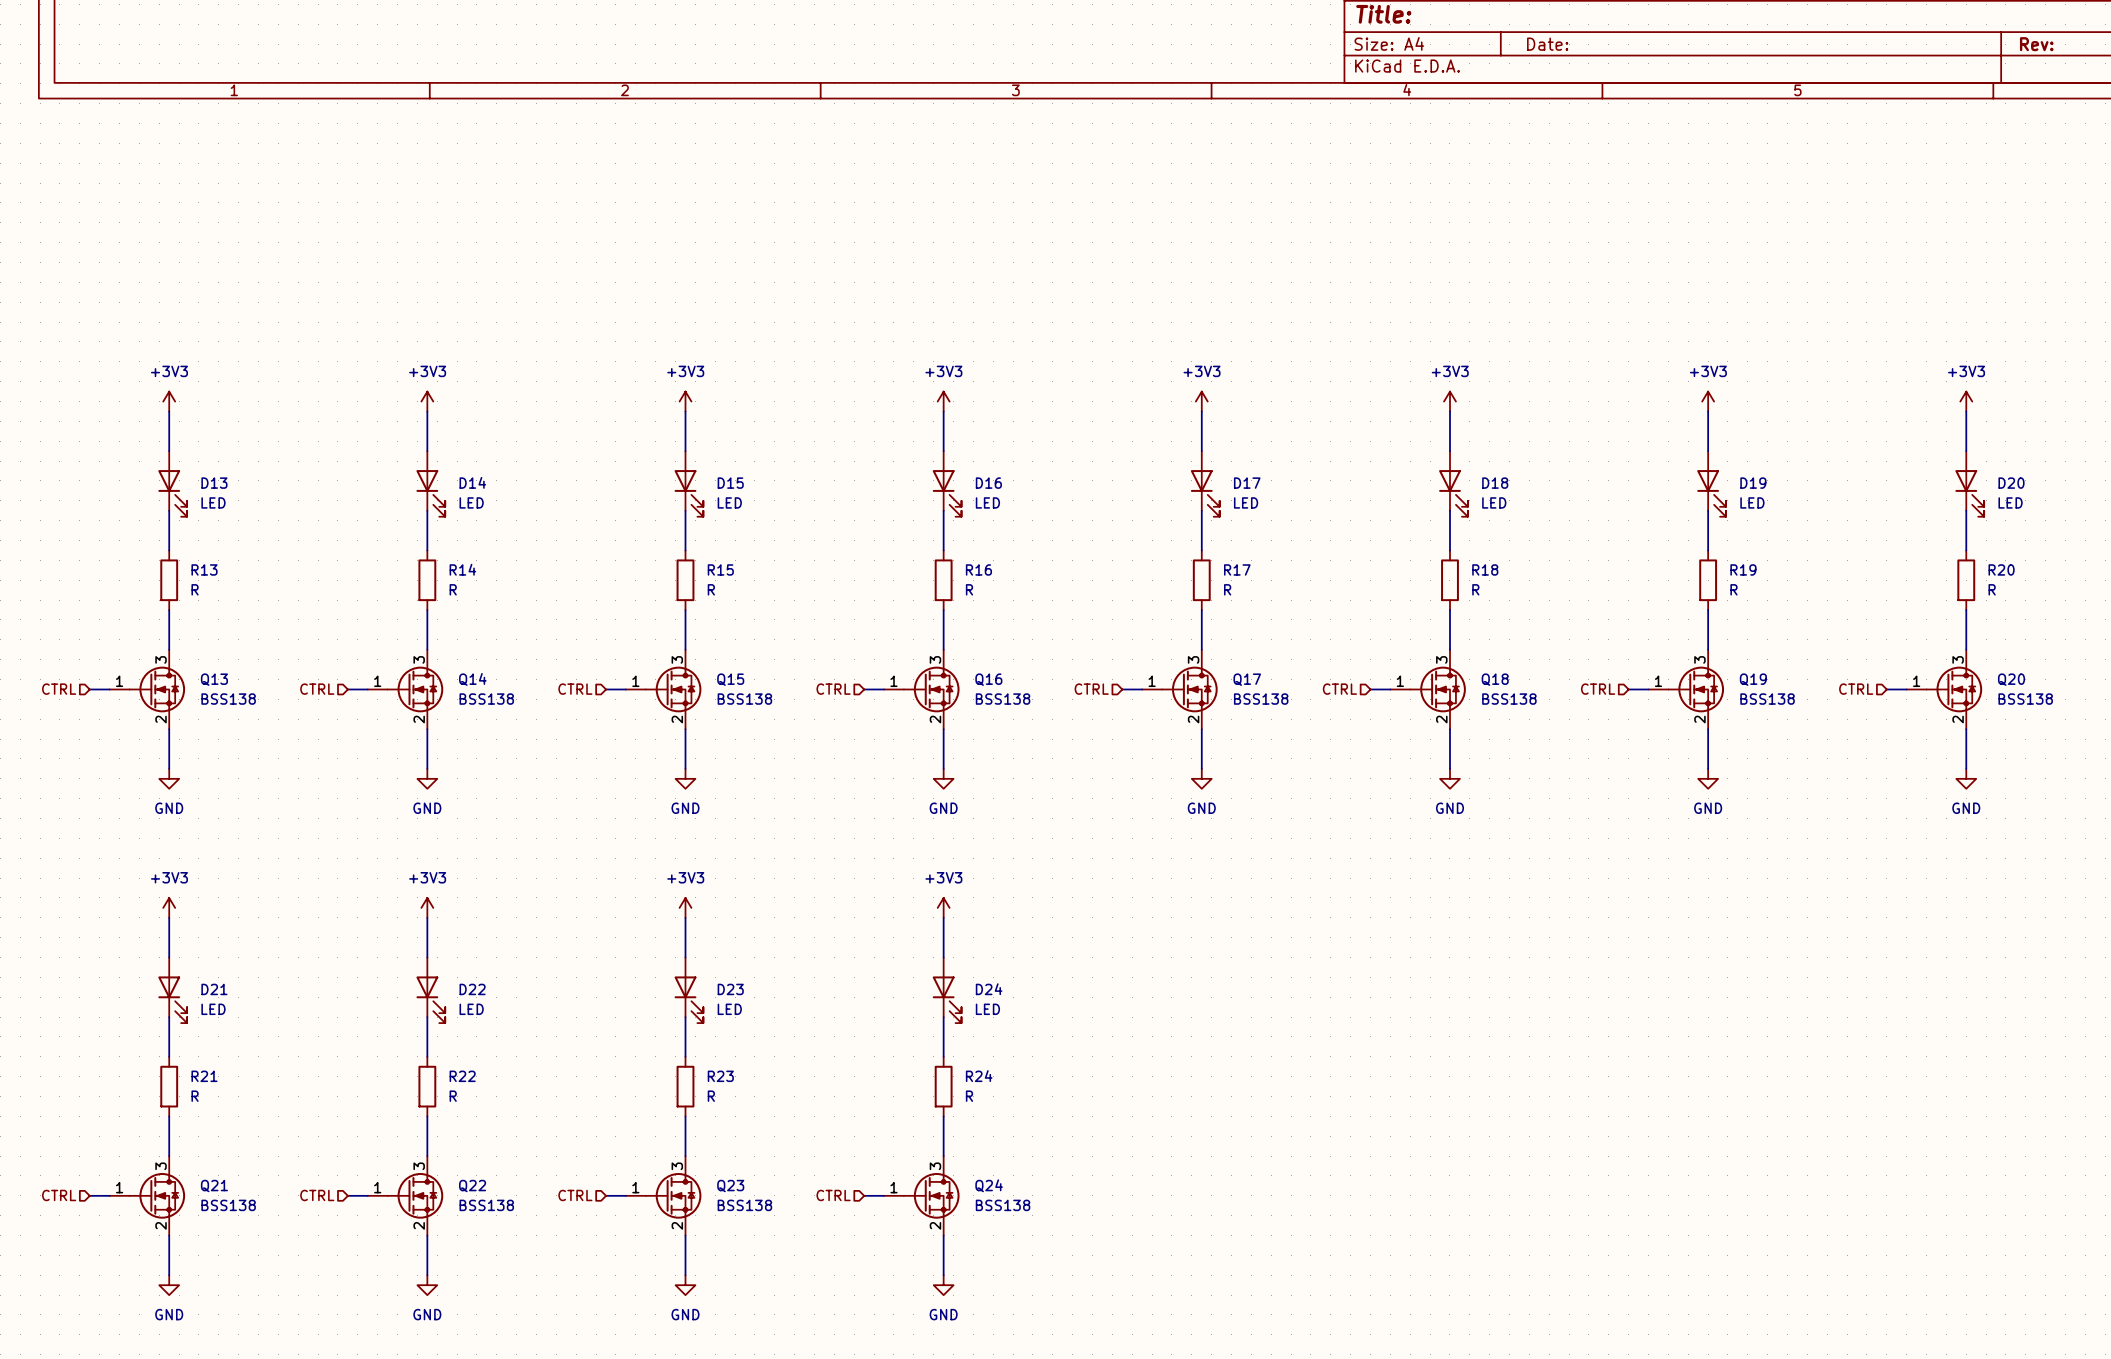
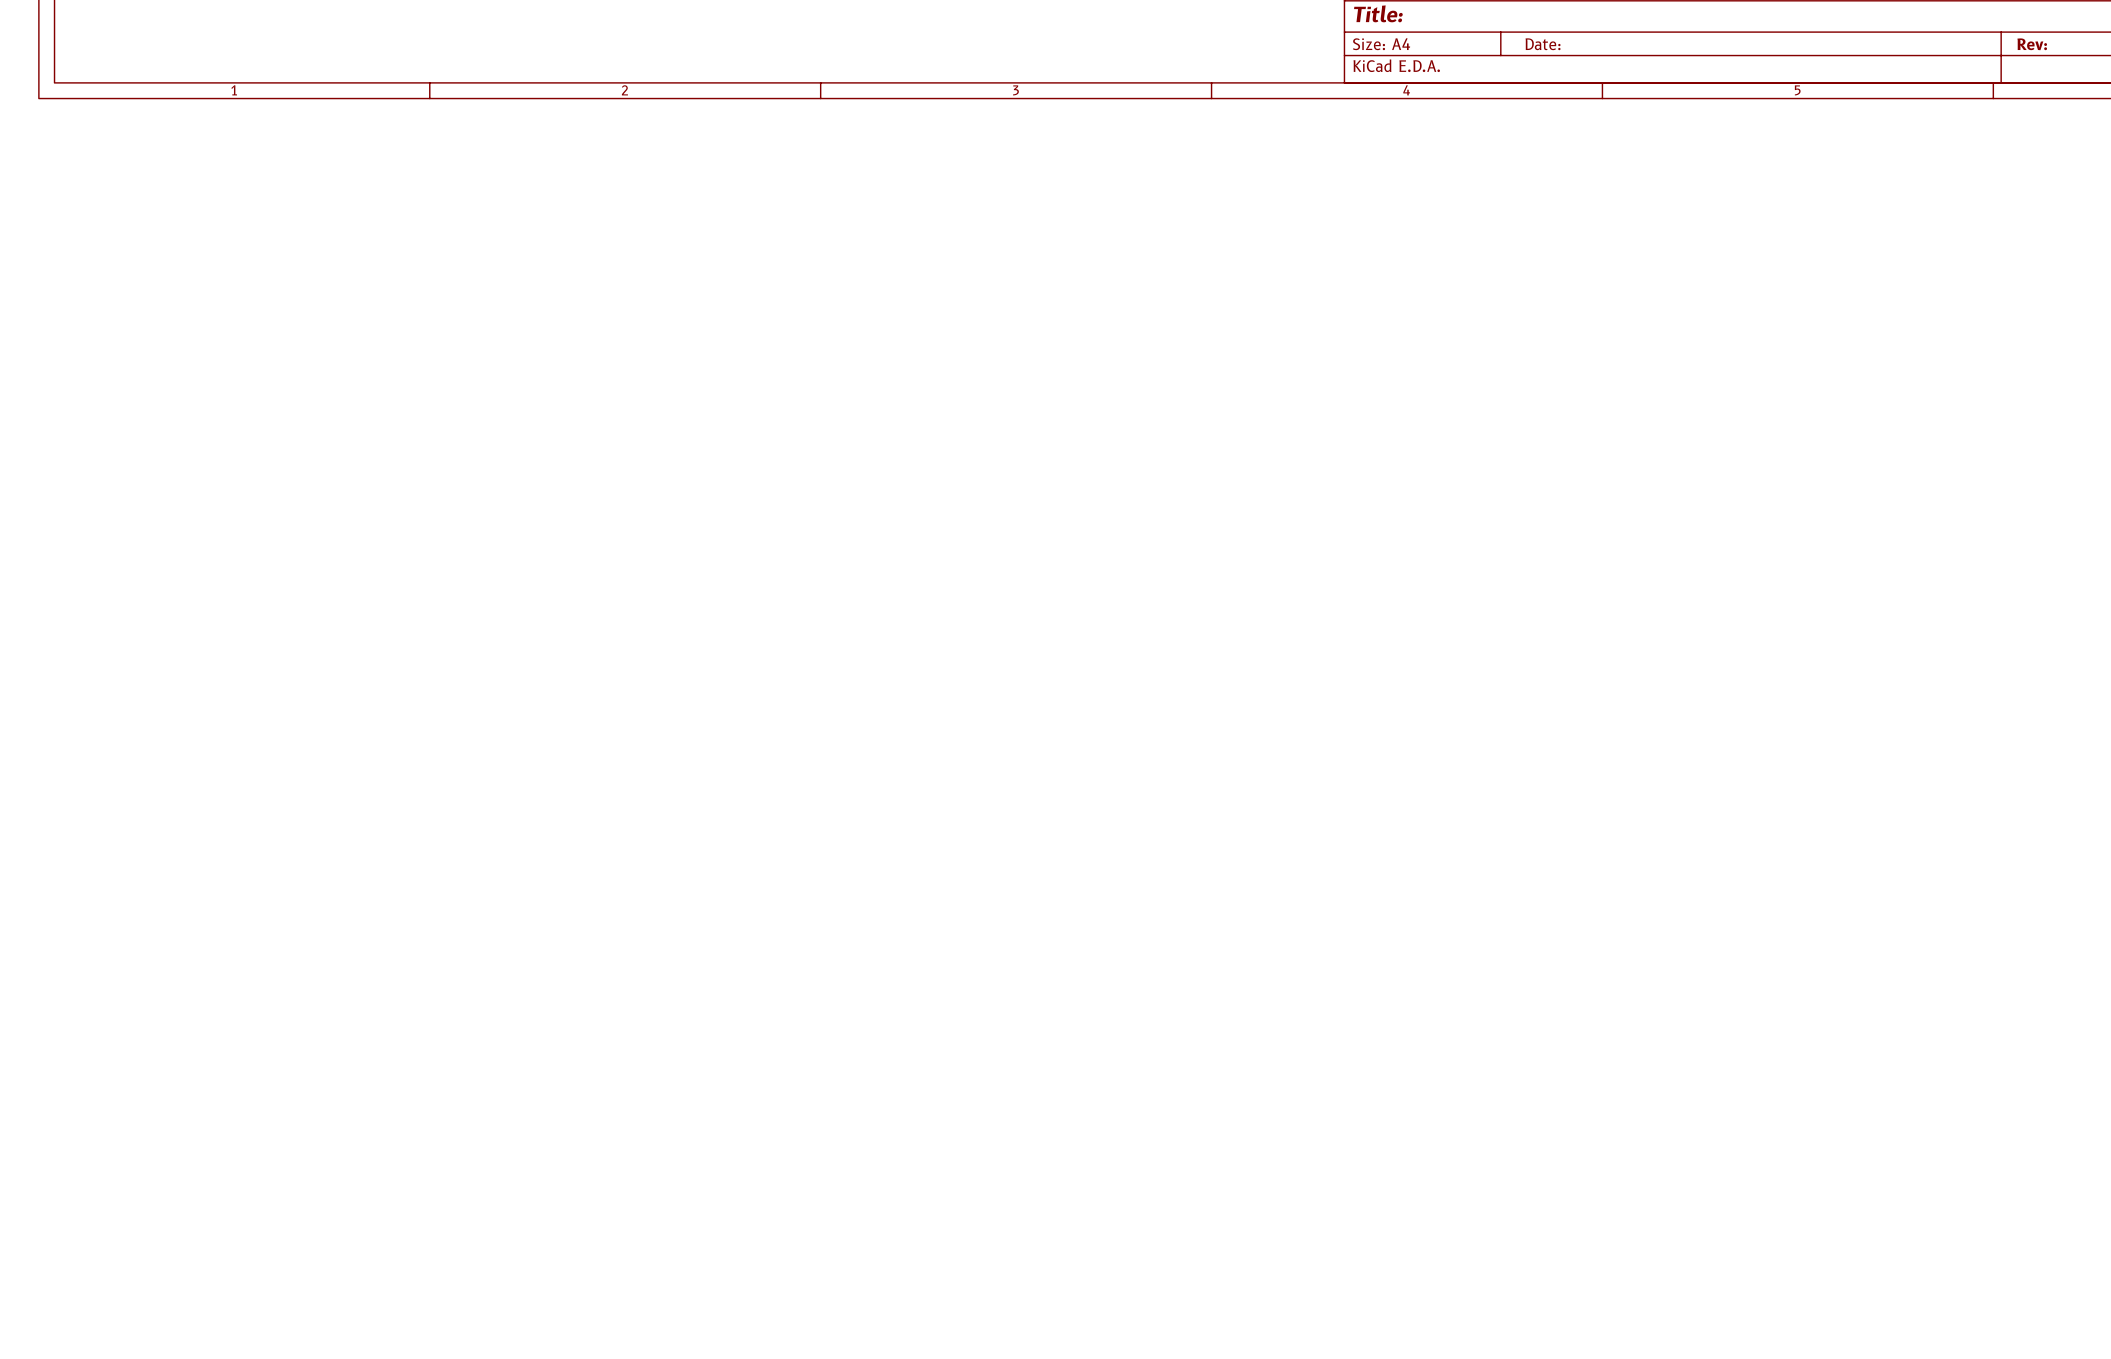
power symbol: +3V3 (169, 401) -> none
power symbol: +3V3 (427, 401) -> none
power symbol: +3V3 (685, 401) -> none
power symbol: +3V3 (943, 401) -> none
power symbol: +3V3 (1201, 401) -> none
power symbol: +3V3 (1449, 401) -> none
power symbol: +3V3 (1708, 401) -> none
power symbol: +3V3 (1966, 401) -> none
wire: (169, 411) (169, 451) -> none
wire: (427, 411) (427, 451) -> none
wire: (685, 411) (685, 451) -> none
wire: (943, 411) (943, 451) -> none
wire: (1201, 411) (1201, 451) -> none
wire: (1449, 411) (1449, 451) -> none
wire: (1708, 411) (1708, 451) -> none
wire: (1966, 411) (1966, 451) -> none
D13: LED (172, 483) -> none
D14: LED (430, 483) -> none
D15: LED (688, 483) -> none
D16: LED (947, 483) -> none
D17: LED (1205, 483) -> none
D18: LED (1453, 483) -> none
D19: LED (1711, 483) -> none
D20: LED (1969, 483) -> none
wire: (169, 510) (169, 550) -> none
wire: (427, 510) (427, 550) -> none
wire: (685, 510) (685, 550) -> none
wire: (943, 510) (943, 550) -> none
wire: (1201, 510) (1201, 550) -> none
wire: (1449, 510) (1449, 550) -> none
wire: (1708, 510) (1708, 550) -> none
wire: (1966, 510) (1966, 550) -> none
R13: R (169, 580) -> none
R14: R (427, 580) -> none
R15: R (685, 580) -> none
R16: R (943, 580) -> none
R17: R (1201, 580) -> none
R18: R (1449, 580) -> none
R19: R (1708, 580) -> none
R20: R (1966, 580) -> none
wire: (169, 610) (169, 649) -> none
wire: (427, 610) (427, 649) -> none
wire: (685, 610) (685, 649) -> none
wire: (943, 610) (943, 649) -> none
wire: (1201, 610) (1201, 649) -> none
wire: (1449, 610) (1449, 649) -> none
wire: (1708, 610) (1708, 649) -> none
wire: (1966, 610) (1966, 649) -> none
hierarchical label: CTRL (59, 689) -> none
wire: (89, 689) (109, 689) -> none
Q13: BSS138 (147, 689) -> none
hierarchical label: CTRL (317, 689) -> none
wire: (347, 689) (367, 689) -> none
Q14: BSS138 (405, 689) -> none
hierarchical label: CTRL (575, 689) -> none
wire: (606, 689) (625, 689) -> none
Q15: BSS138 (663, 689) -> none
hierarchical label: CTRL (833, 689) -> none
wire: (864, 689) (884, 689) -> none
Q16: BSS138 (921, 689) -> none
hierarchical label: CTRL (1091, 689) -> none
wire: (1122, 689) (1142, 689) -> none
Q17: BSS138 (1179, 689) -> none
hierarchical label: CTRL (1339, 689) -> none
wire: (1370, 689) (1390, 689) -> none
Q18: BSS138 (1428, 689) -> none
hierarchical label: CTRL (1598, 689) -> none
wire: (1628, 689) (1648, 689) -> none
Q19: BSS138 (1686, 689) -> none
hierarchical label: CTRL (1856, 689) -> none
wire: (1886, 689) (1906, 689) -> none
Q20: BSS138 (1944, 689) -> none
wire: (169, 729) (169, 768) -> none
wire: (427, 729) (427, 768) -> none
wire: (685, 729) (685, 768) -> none
wire: (943, 729) (943, 768) -> none
wire: (1201, 729) (1201, 768) -> none
wire: (1449, 729) (1449, 768) -> none
wire: (1708, 729) (1708, 768) -> none
wire: (1966, 729) (1966, 768) -> none
power symbol: GND (169, 778) -> none
power symbol: GND (427, 778) -> none
power symbol: GND (685, 778) -> none
power symbol: GND (943, 778) -> none
power symbol: GND (1201, 778) -> none
power symbol: GND (1449, 778) -> none
power symbol: GND (1708, 778) -> none
power symbol: GND (1966, 778) -> none
power symbol: +3V3 (169, 907) -> none
power symbol: +3V3 (427, 907) -> none
power symbol: +3V3 (685, 907) -> none
power symbol: +3V3 (943, 907) -> none
wire: (169, 917) (169, 957) -> none
wire: (427, 917) (427, 957) -> none
wire: (685, 917) (685, 957) -> none
wire: (943, 917) (943, 957) -> none
D21: LED (172, 990) -> none
D22: LED (430, 990) -> none
D23: LED (688, 990) -> none
D24: LED (947, 990) -> none
wire: (169, 1017) (169, 1056) -> none
wire: (427, 1017) (427, 1056) -> none
wire: (685, 1017) (685, 1056) -> none
wire: (943, 1017) (943, 1056) -> none
R21: R (169, 1086) -> none
R22: R (427, 1086) -> none
R23: R (685, 1086) -> none
R24: R (943, 1086) -> none
wire: (169, 1116) (169, 1156) -> none
wire: (427, 1116) (427, 1156) -> none
wire: (685, 1116) (685, 1156) -> none
wire: (943, 1116) (943, 1156) -> none
hierarchical label: CTRL (59, 1195) -> none
wire: (89, 1195) (109, 1195) -> none
Q21: BSS138 (147, 1195) -> none
hierarchical label: CTRL (317, 1195) -> none
wire: (347, 1195) (367, 1195) -> none
Q22: BSS138 (405, 1195) -> none
hierarchical label: CTRL (575, 1195) -> none
wire: (606, 1195) (625, 1195) -> none
Q23: BSS138 (663, 1195) -> none
hierarchical label: CTRL (833, 1195) -> none
wire: (864, 1195) (884, 1195) -> none
Q24: BSS138 (921, 1195) -> none
wire: (169, 1235) (169, 1275) -> none
wire: (427, 1235) (427, 1275) -> none
wire: (685, 1235) (685, 1275) -> none
wire: (943, 1235) (943, 1275) -> none
power symbol: GND (169, 1285) -> none
power symbol: GND (427, 1285) -> none
power symbol: GND (685, 1285) -> none
power symbol: GND (943, 1285) -> none

